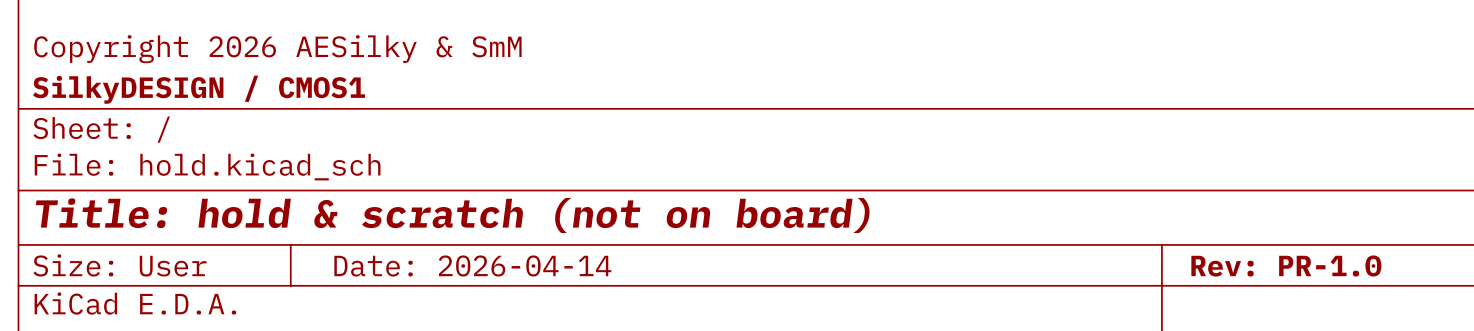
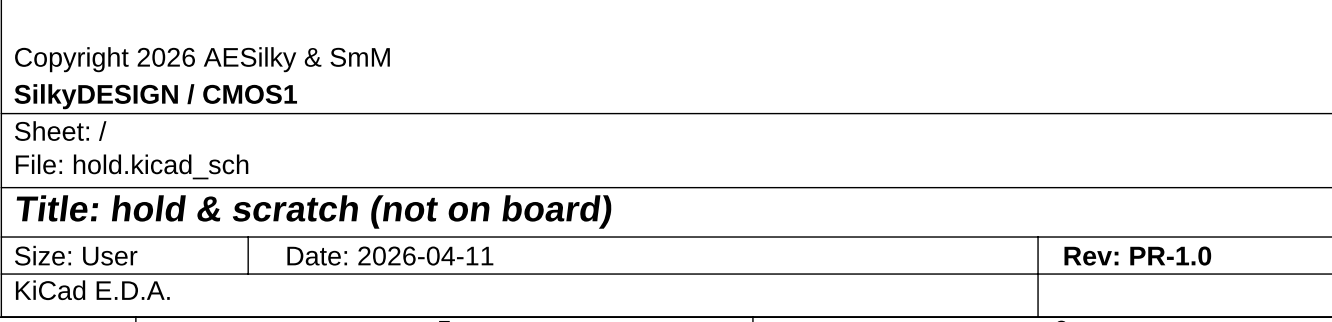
title block: Date: 2026-04-14 (472, 265) -> Date: 2026-04-11 (390, 256)

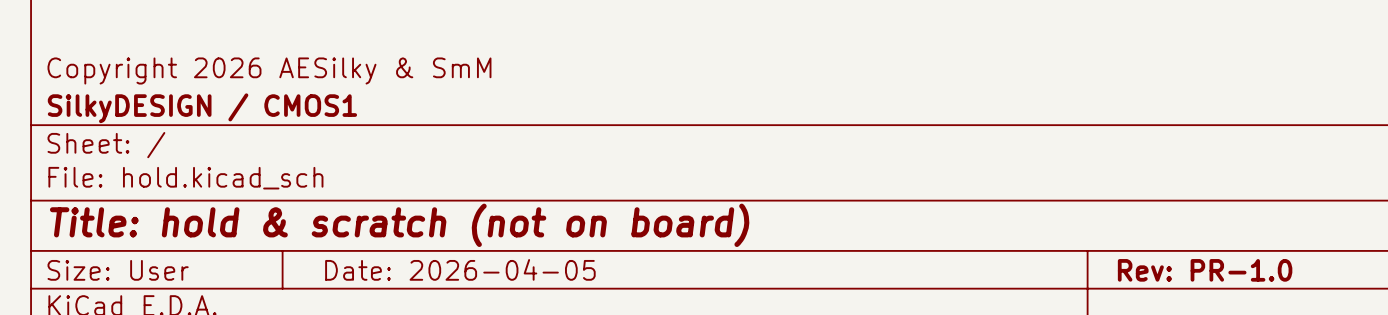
title block: Date: 2026-04-11 (390, 256) -> Date: 2026-04-05 (460, 269)

